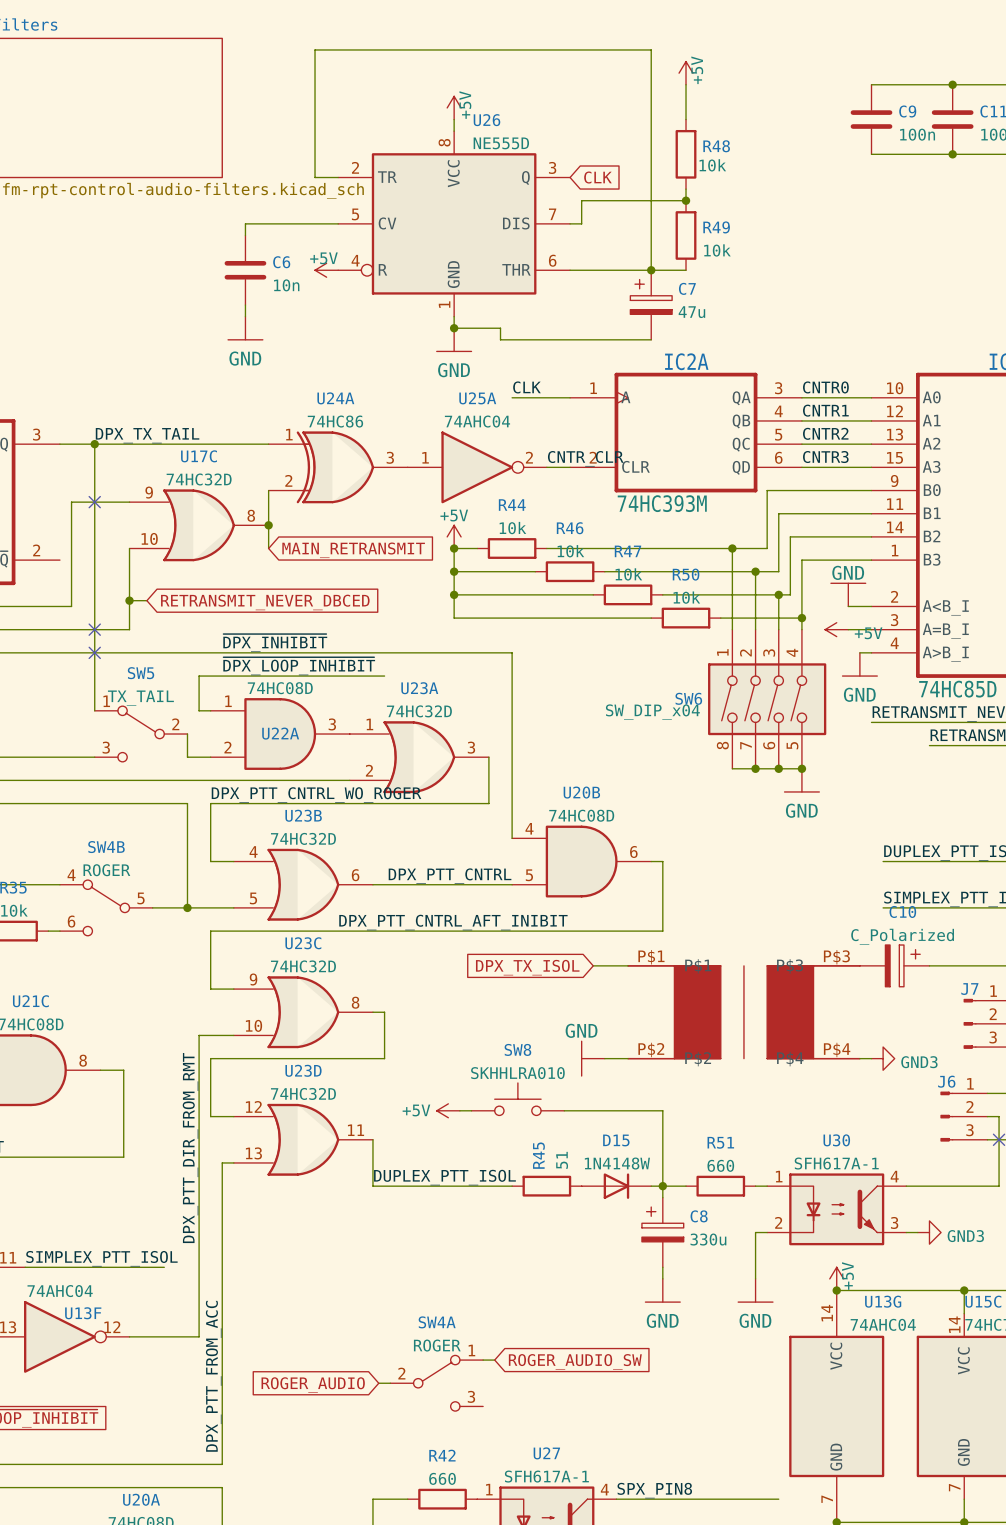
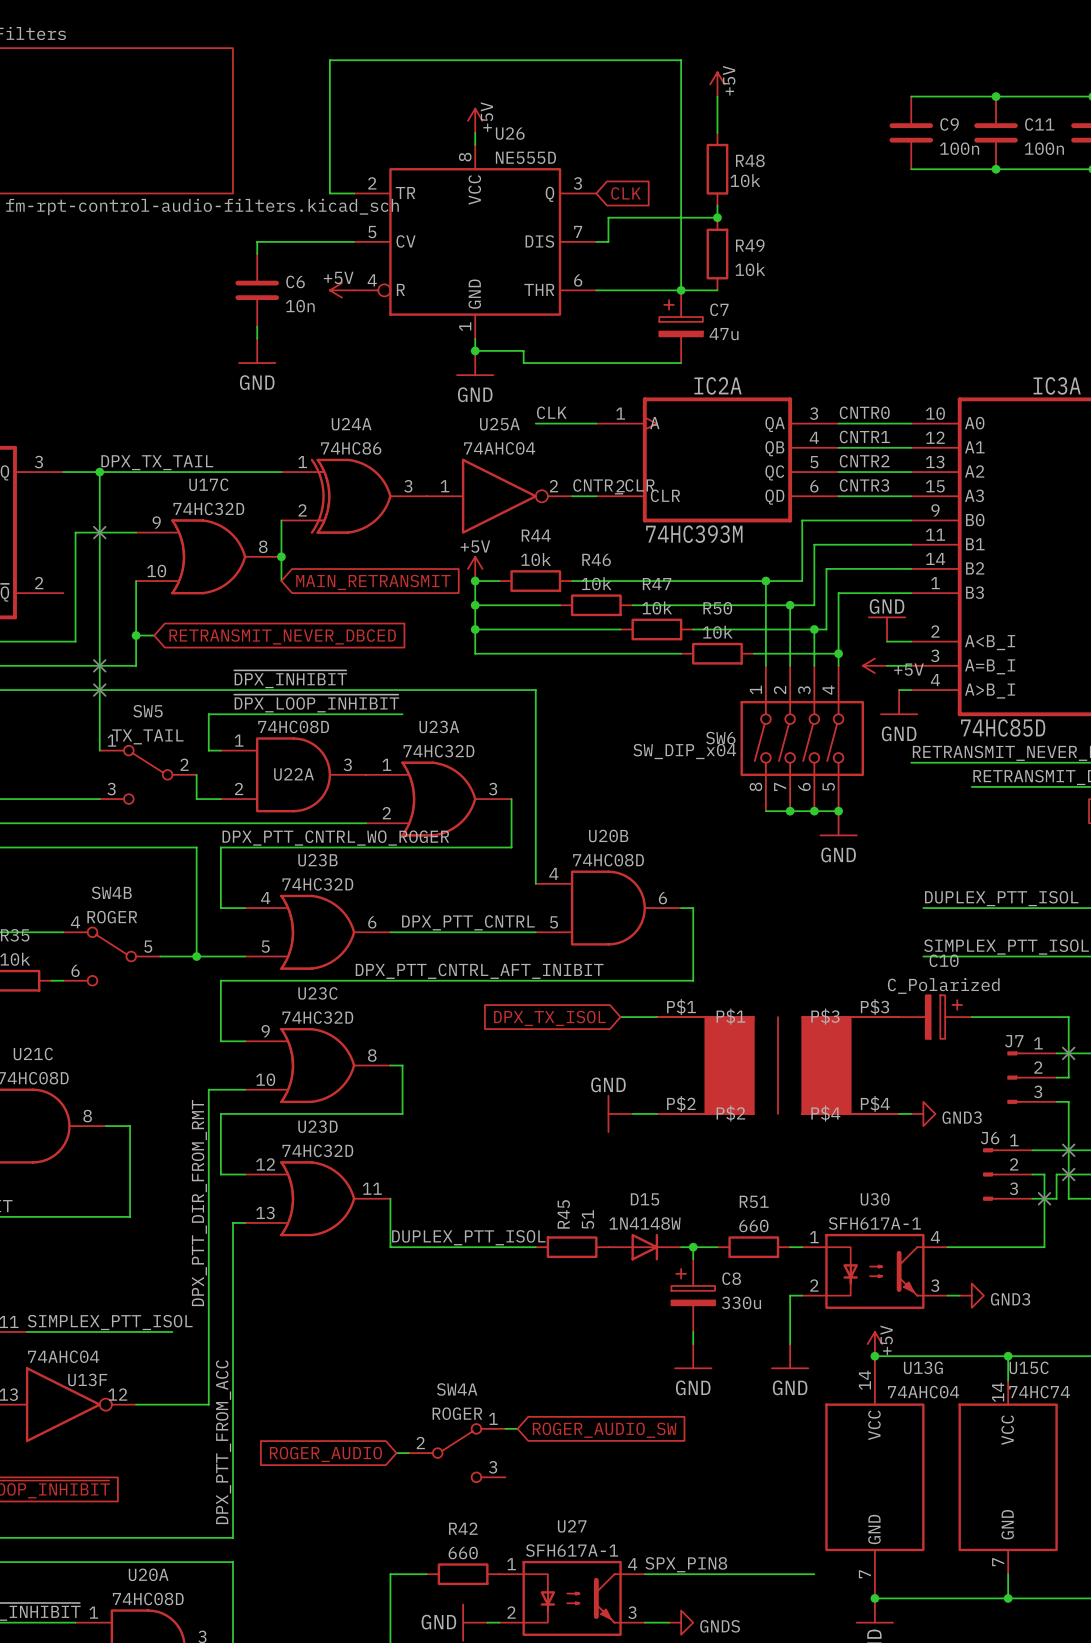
SW8: SKHHLRA010 (517, 1099) -> none
power symbol: +5V (448, 1110) -> none
wire: (459, 1110) (471, 1110) -> none
wire: (564, 1110) (662, 1110) (662, 1186) -> none

